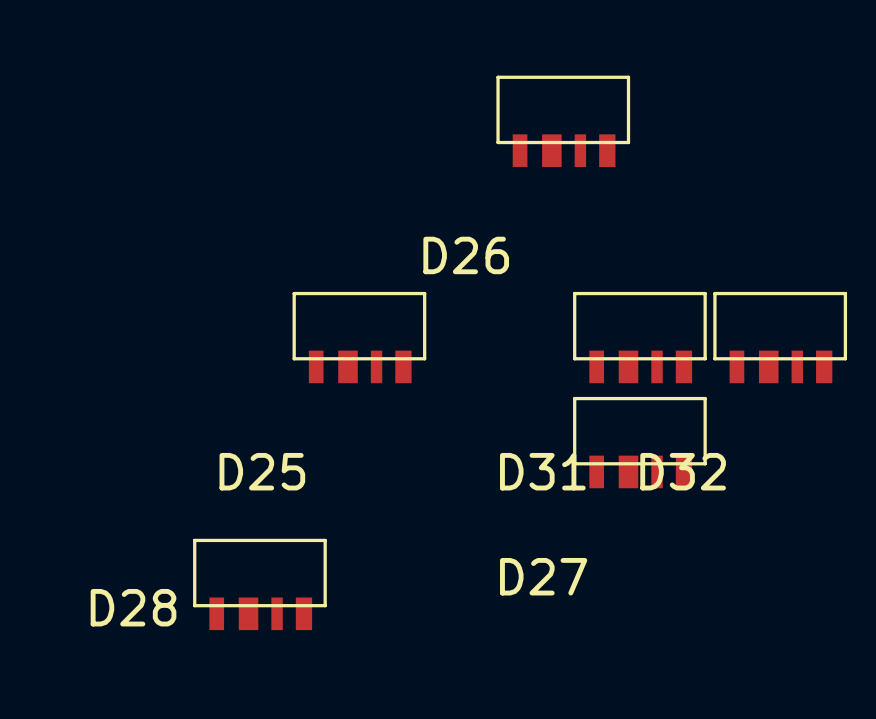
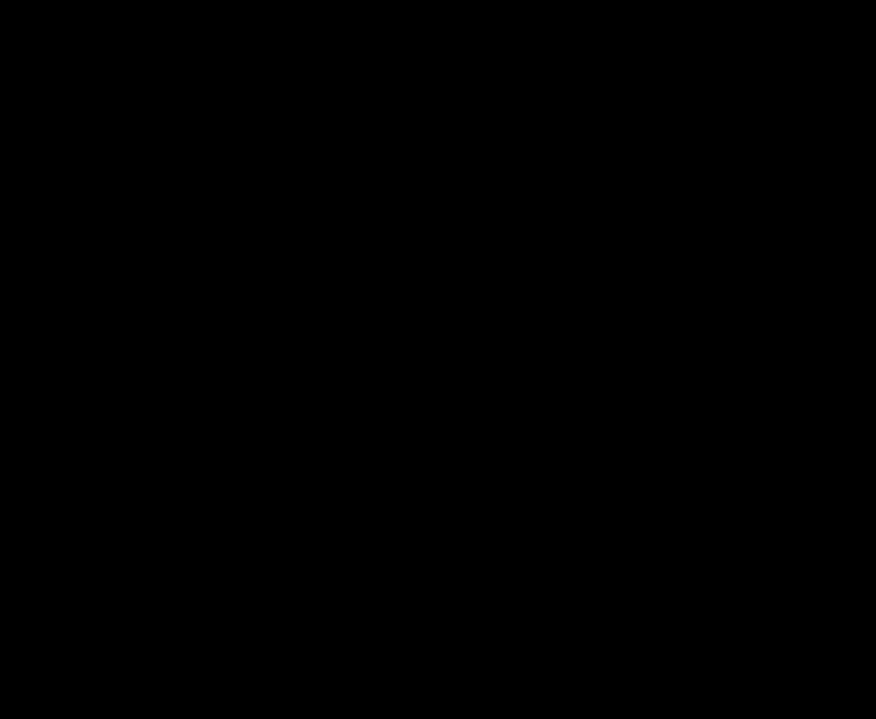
D26: (563, 121) -> none
D25: (359, 337) -> none
D31: (639, 337) -> none
D32: (780, 337) -> none
D27: (639, 442) -> none
D28: (259, 584) -> none

